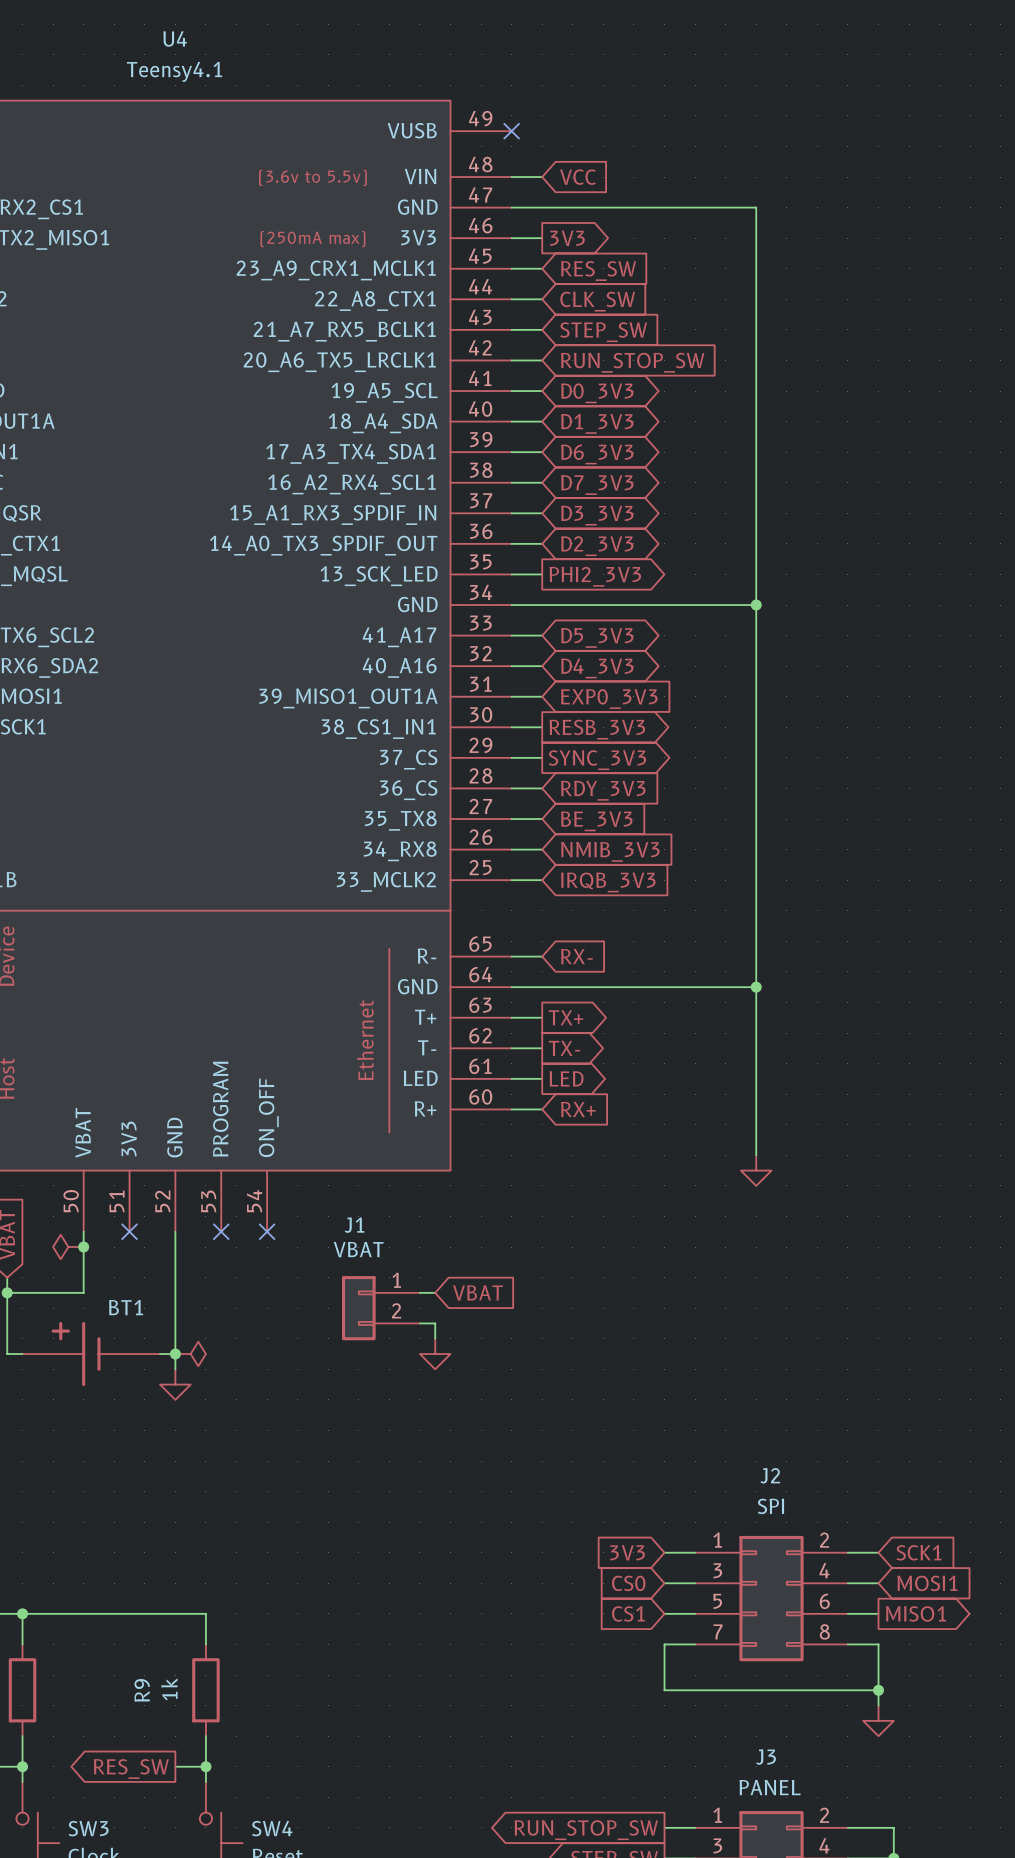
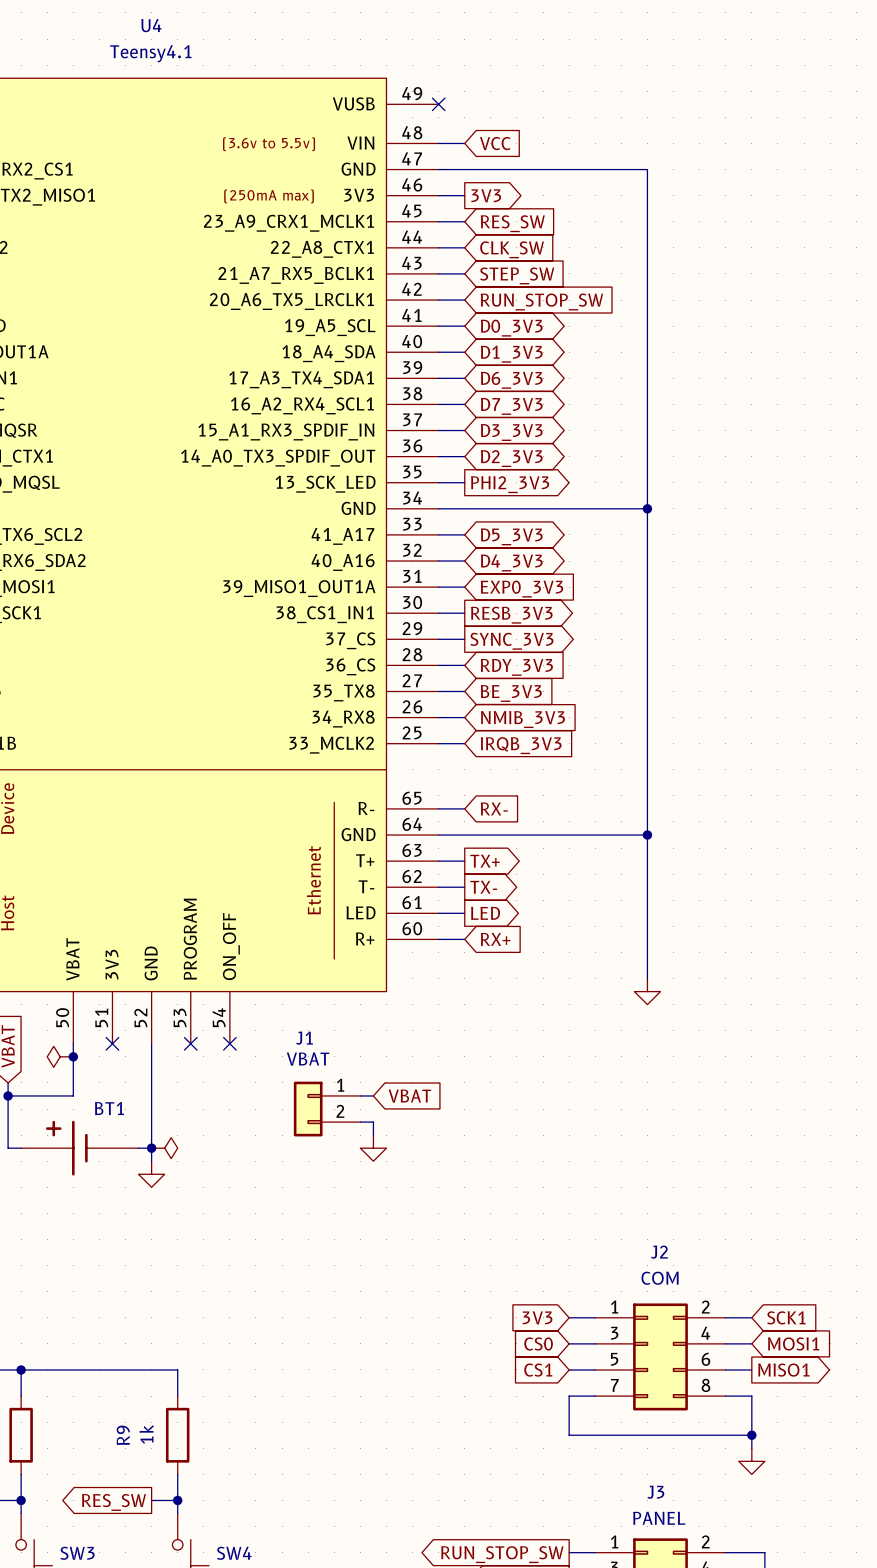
J2 value: SPI (770, 1506) -> COM (660, 1278)

